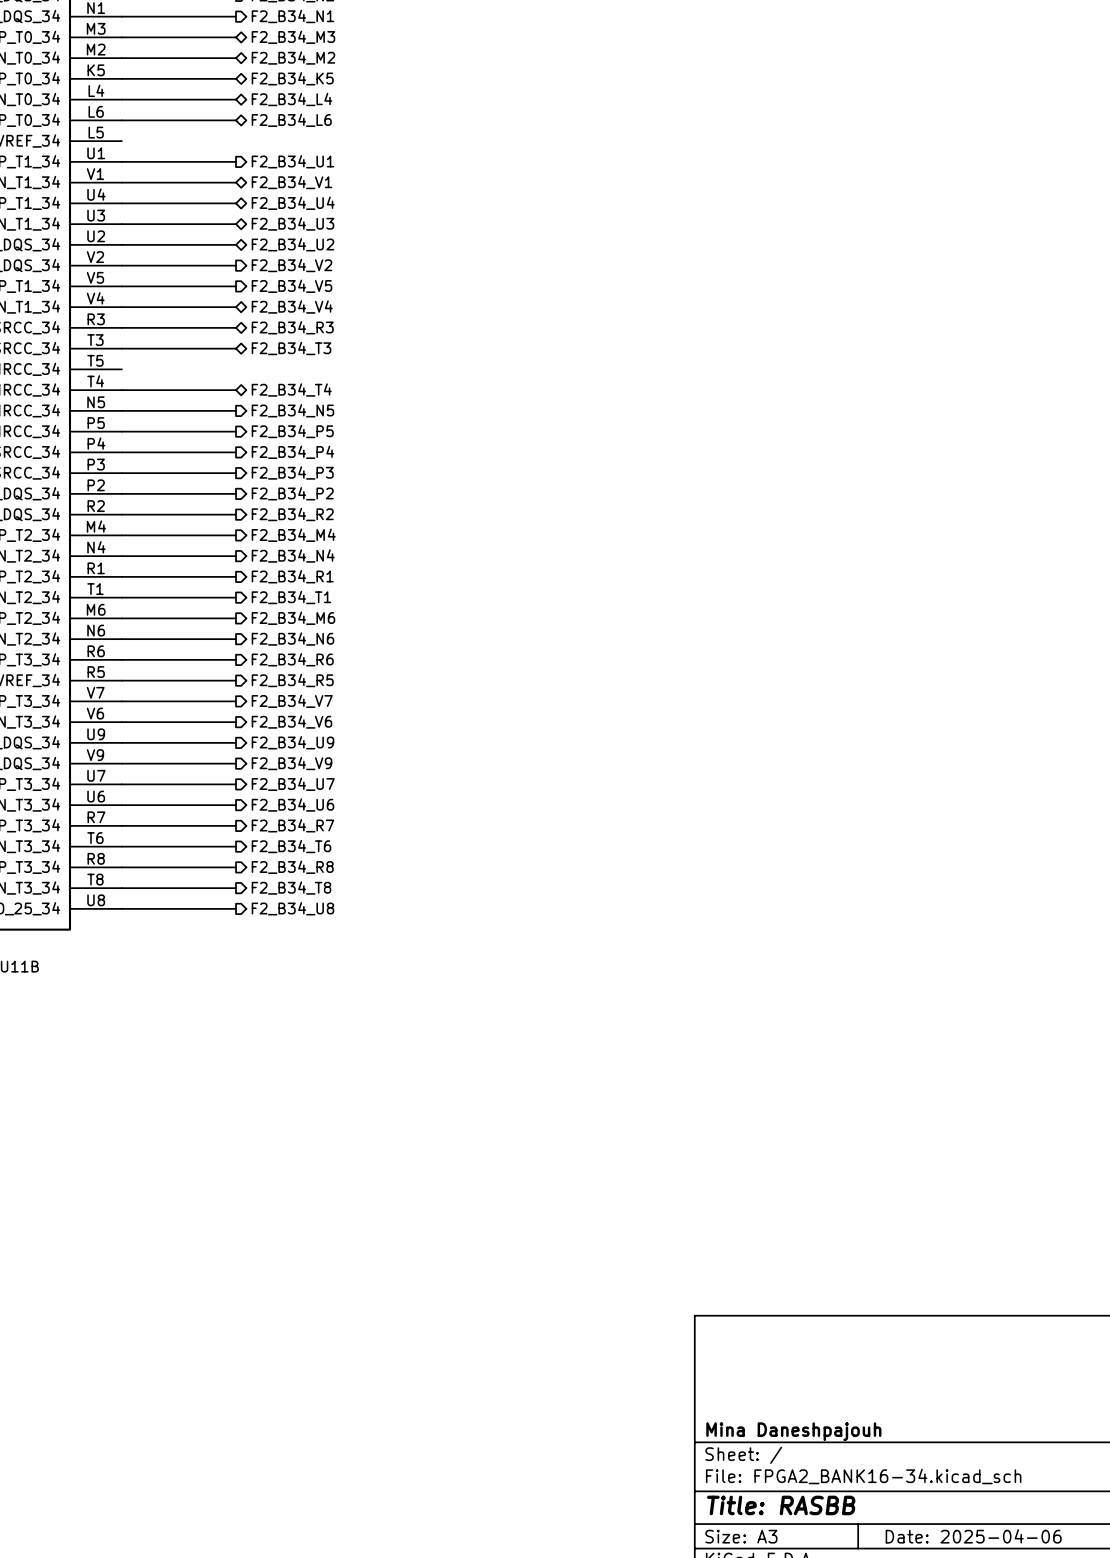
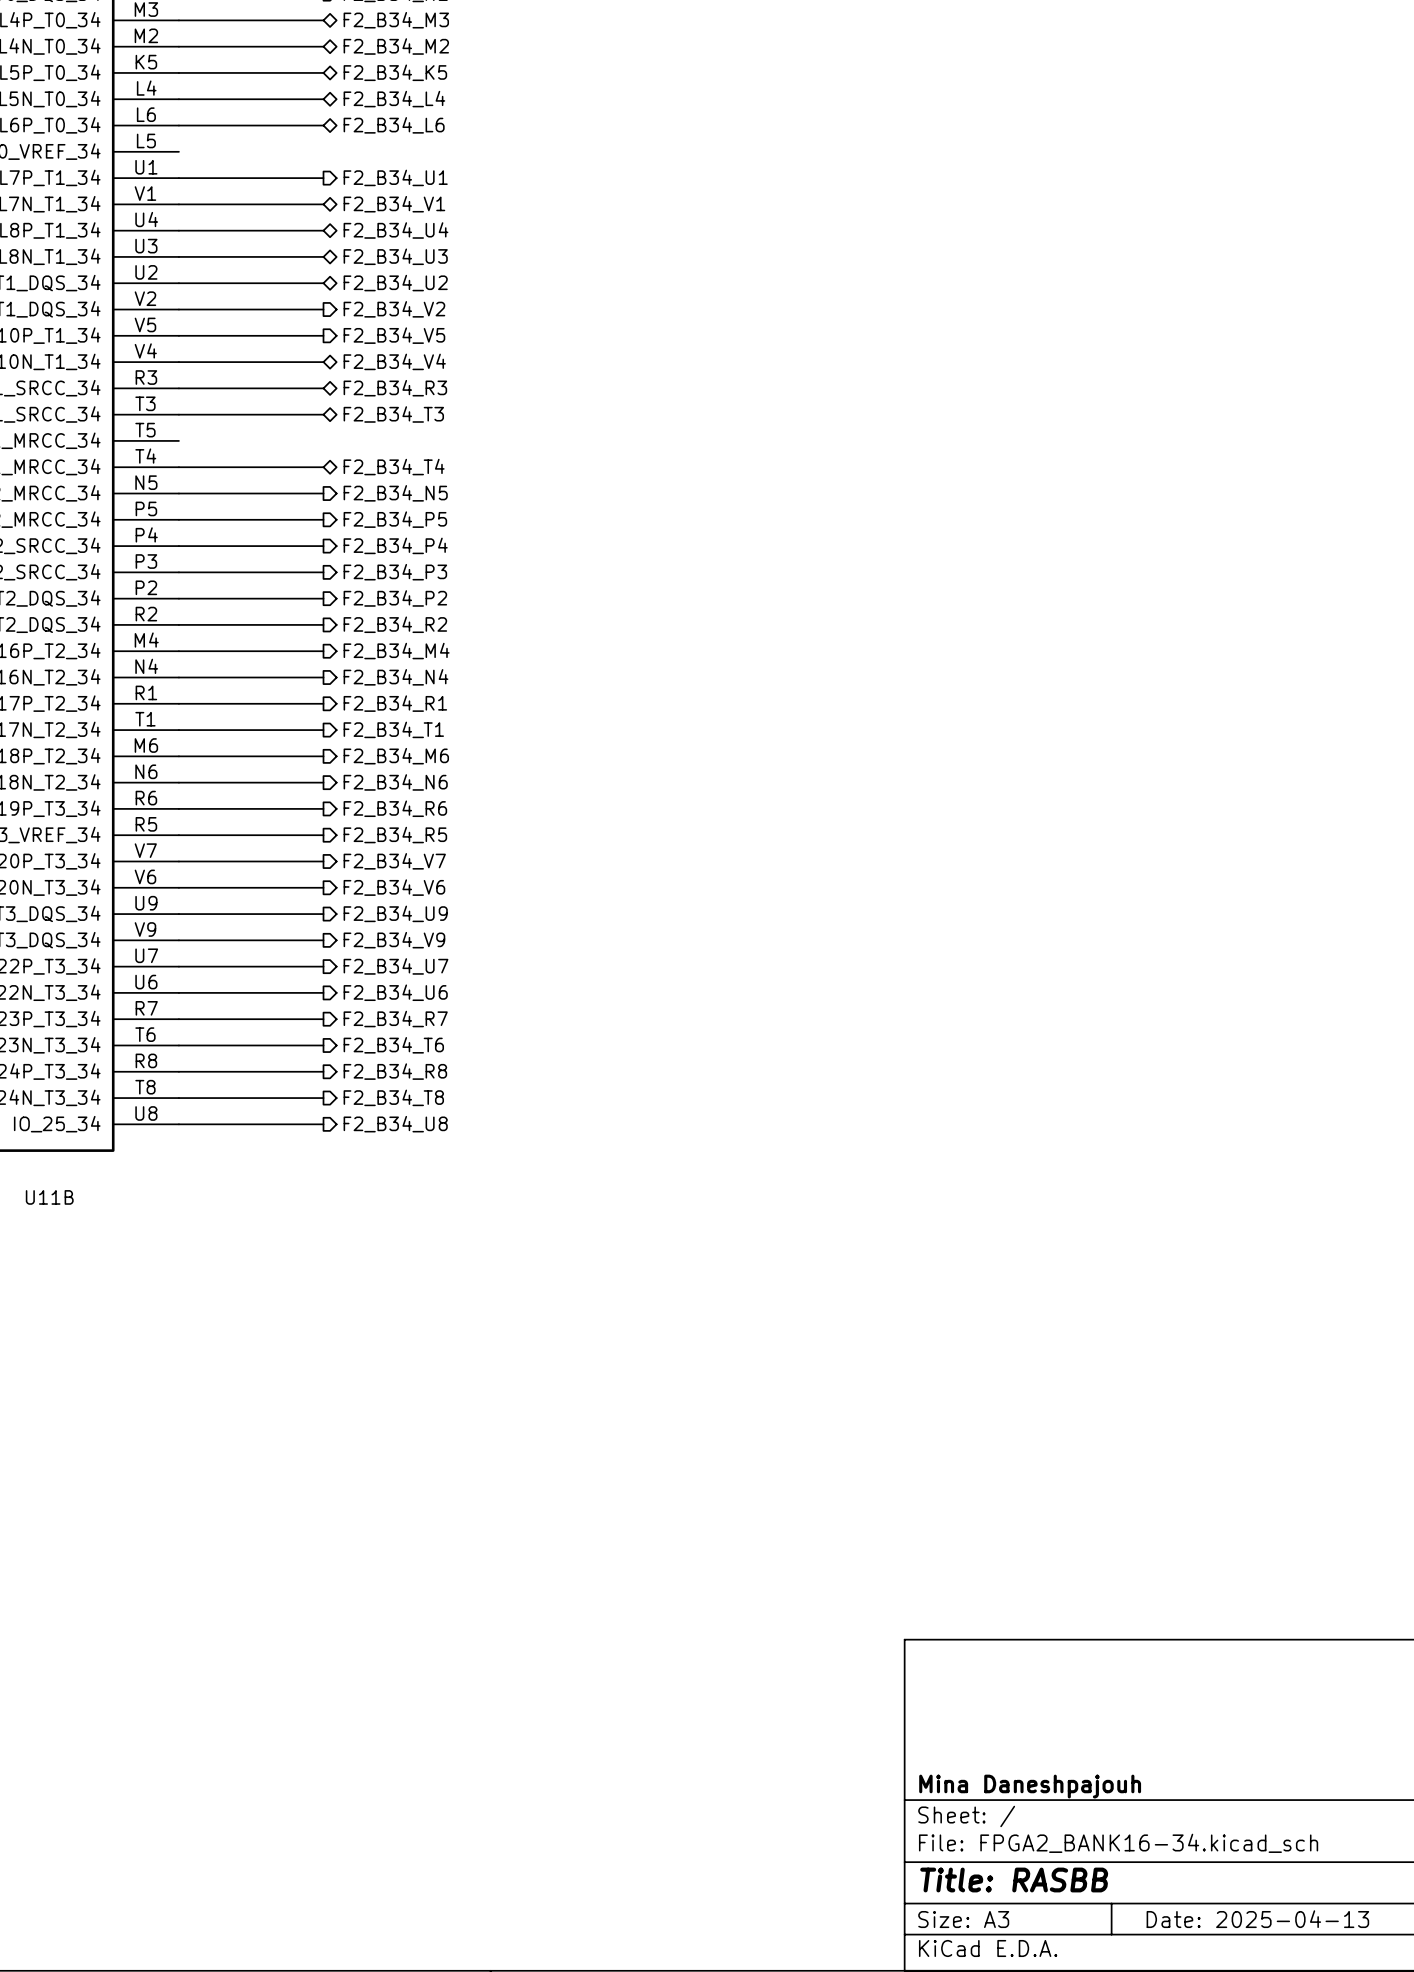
title block: Date: 2025-04-06 (973, 1536) -> Date: 2025-04-13 (1257, 1919)

